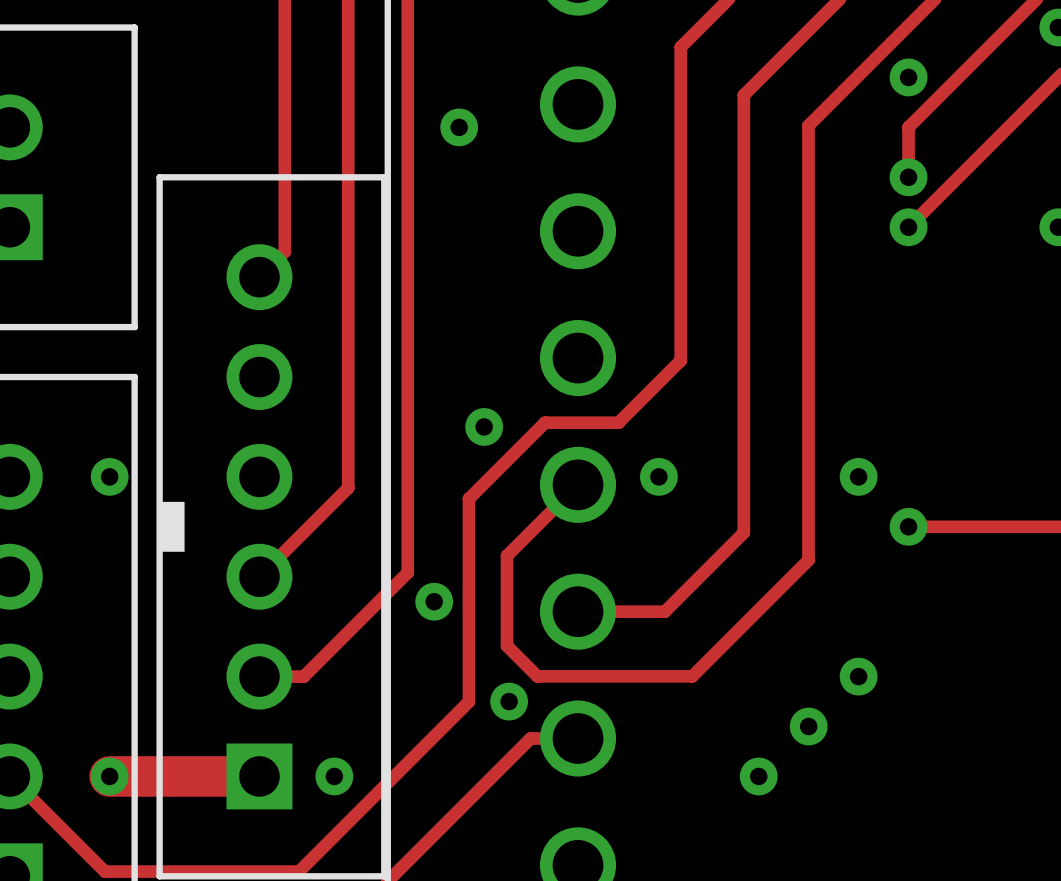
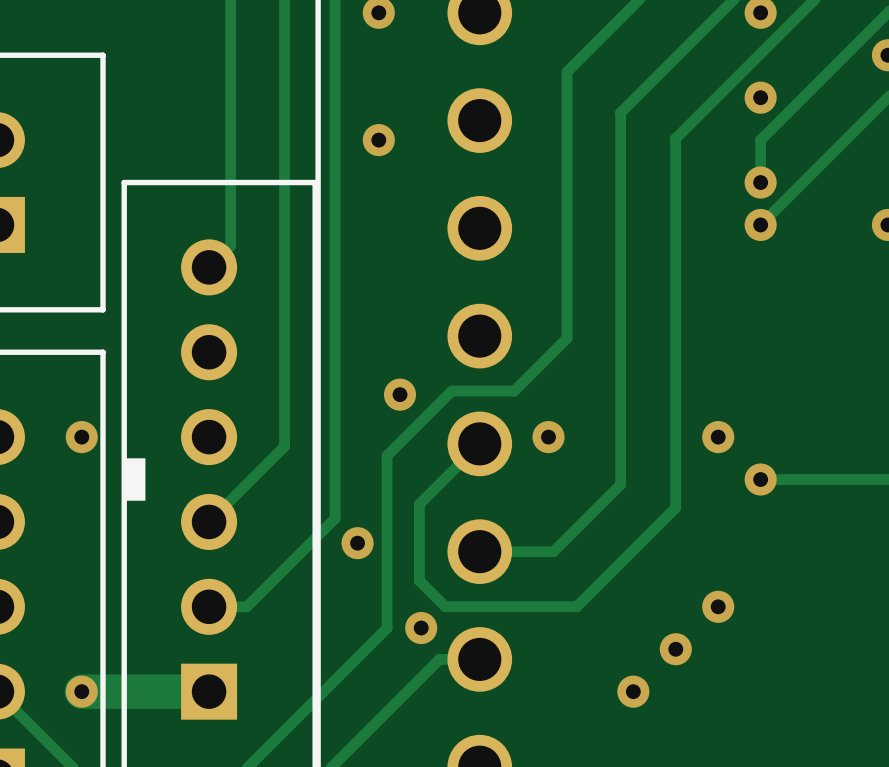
via: (334, 776) -> none

